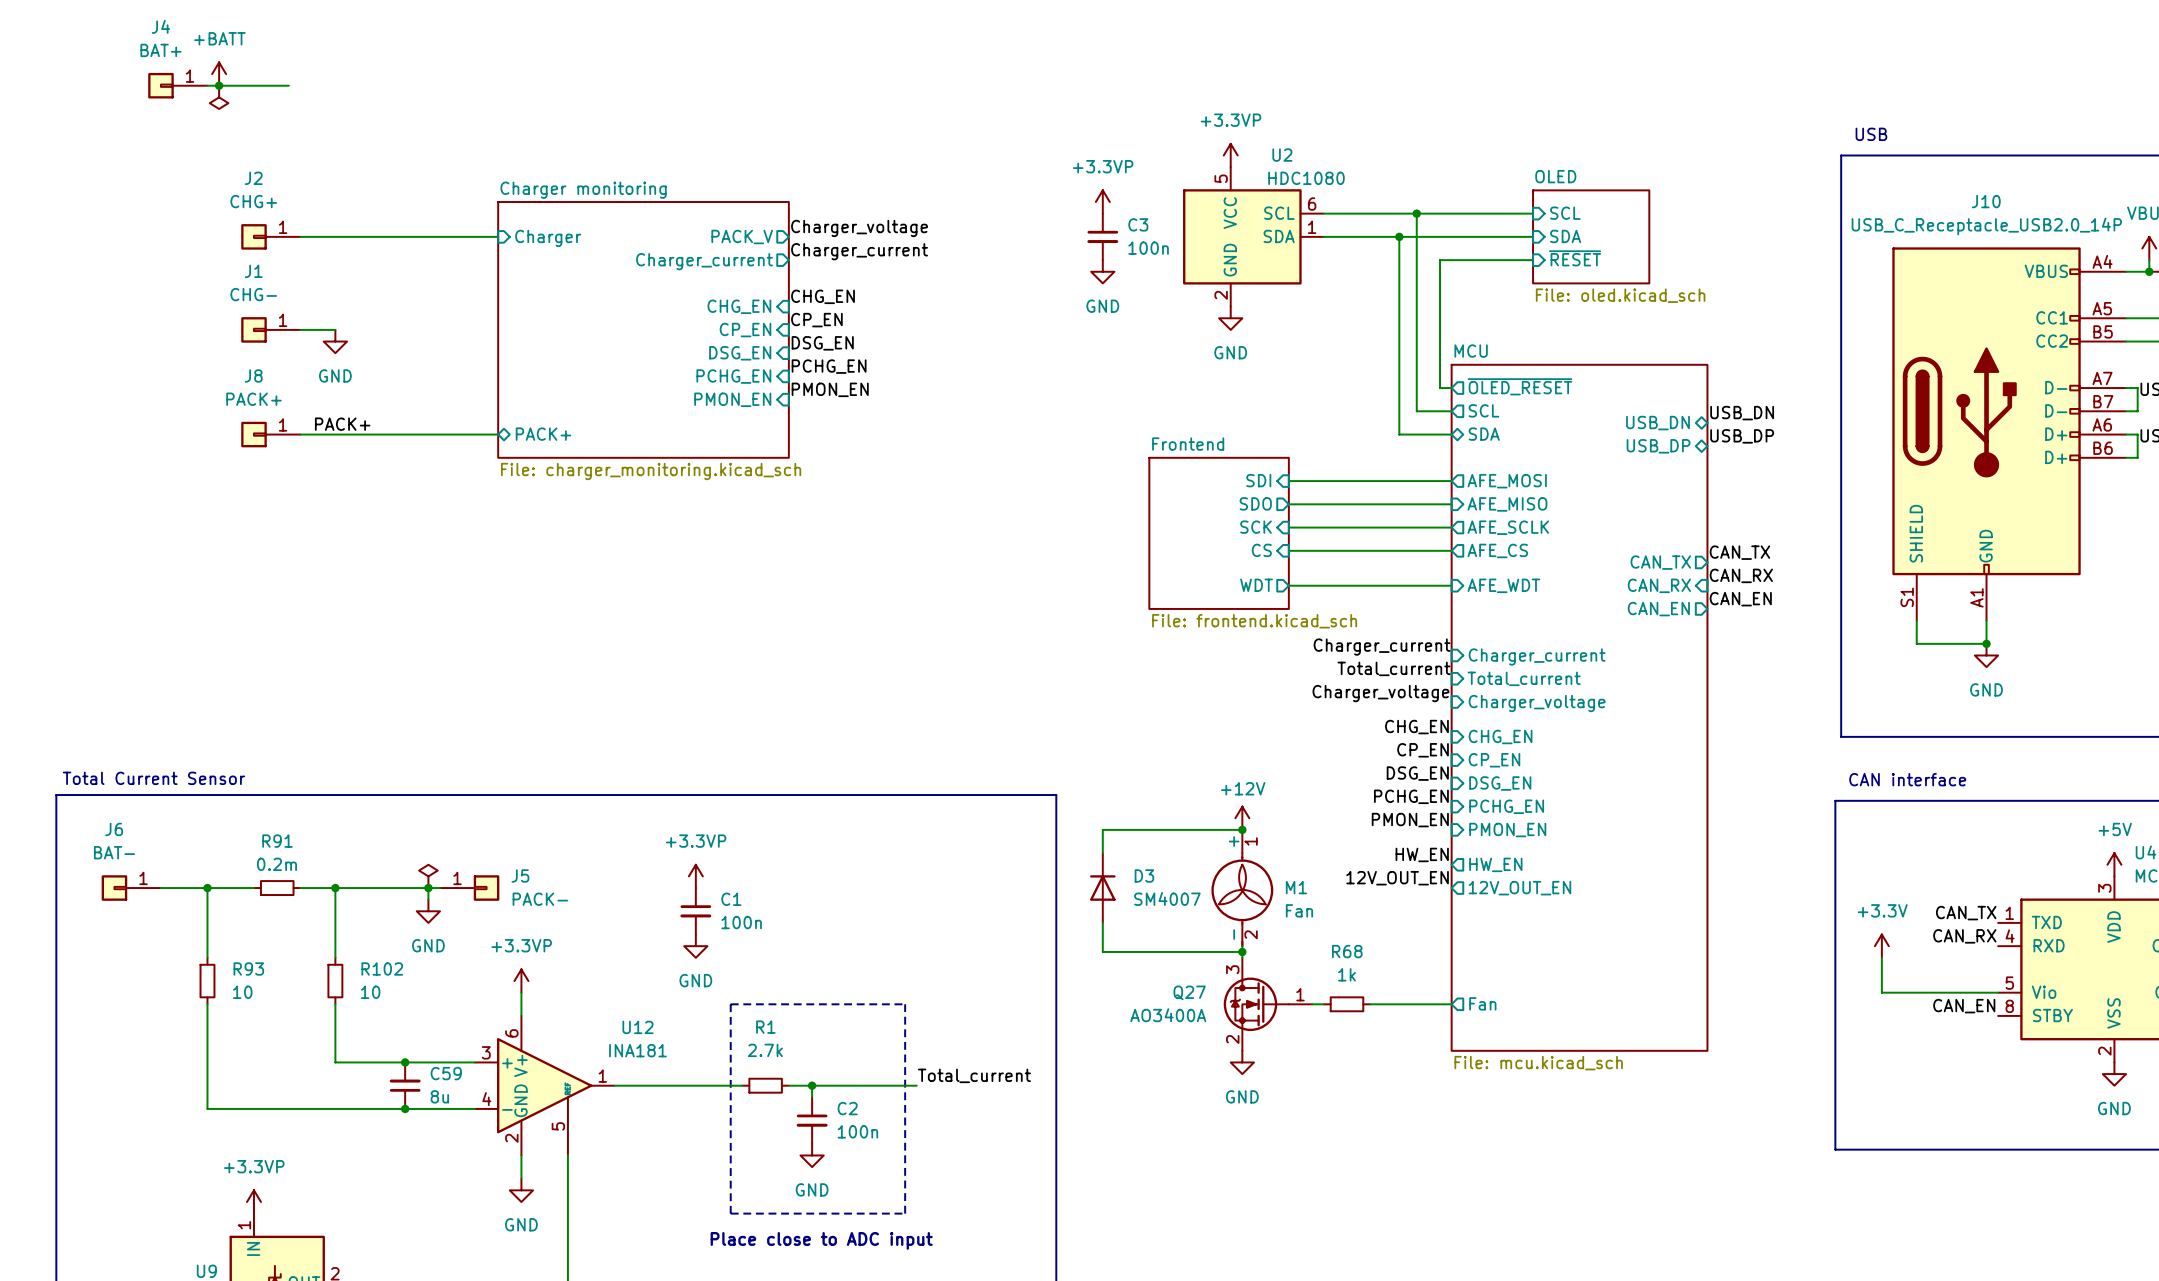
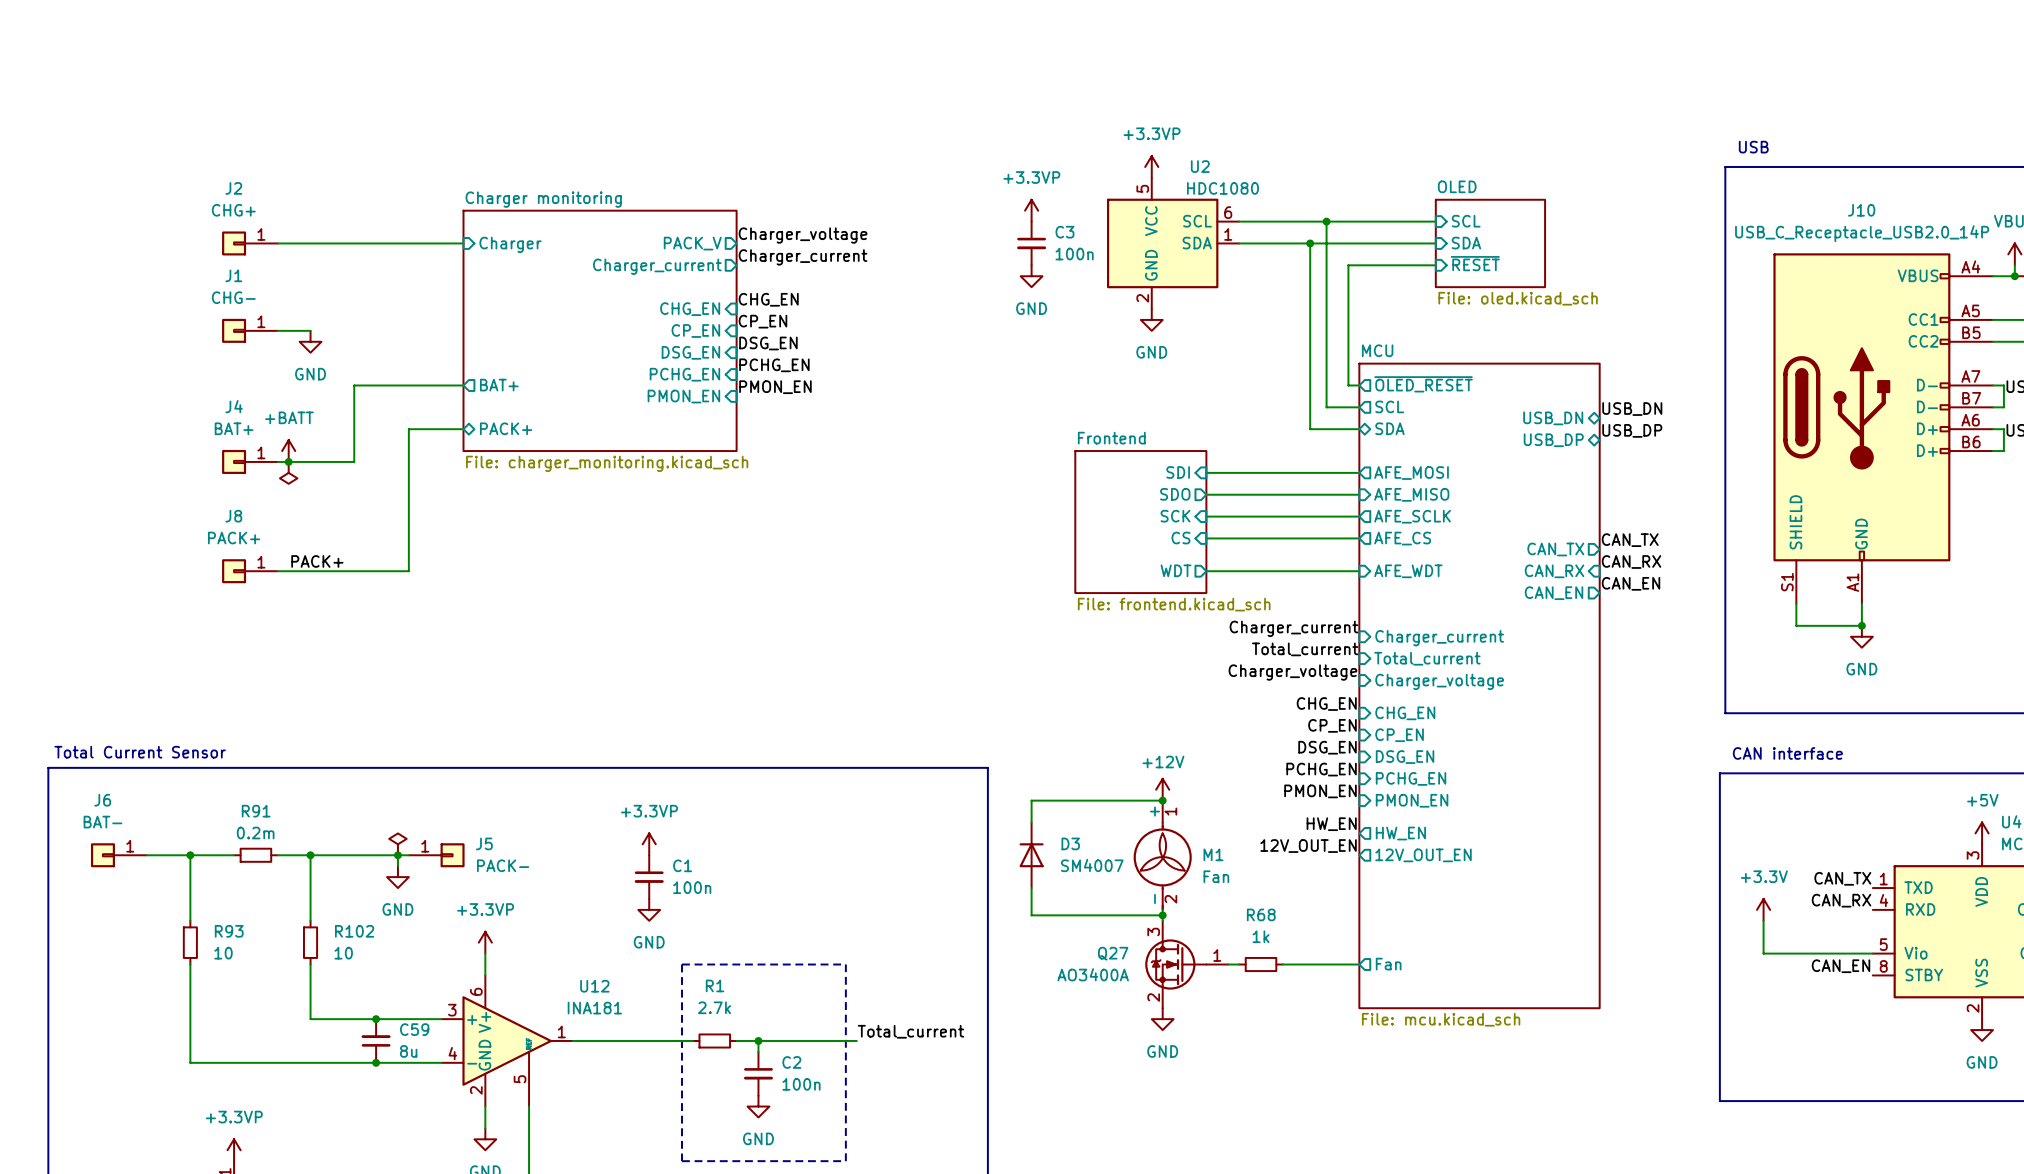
power symbol: +BATT (219, 74) -> none
J4 position: (177, 85) -> (249, 461)
wire: (207, 85) (288, 85) -> none
junction: (219, 85) -> none
power symbol: (219, 97) -> none
sheet pin: none -> BAT+ (499, 385)
wire: none -> (463, 385) (354, 385) (354, 461) (277, 461)
label position: PACK+ (342, 424) -> PACK+ (317, 561)
J8 position: (270, 434) -> (249, 571)
wire: (300, 434) (440, 434) -> (277, 571) (408, 571) (408, 429)
power symbol: none -> +BATT (288, 451)
junction: none -> (288, 461)
power symbol: none -> (288, 472)

